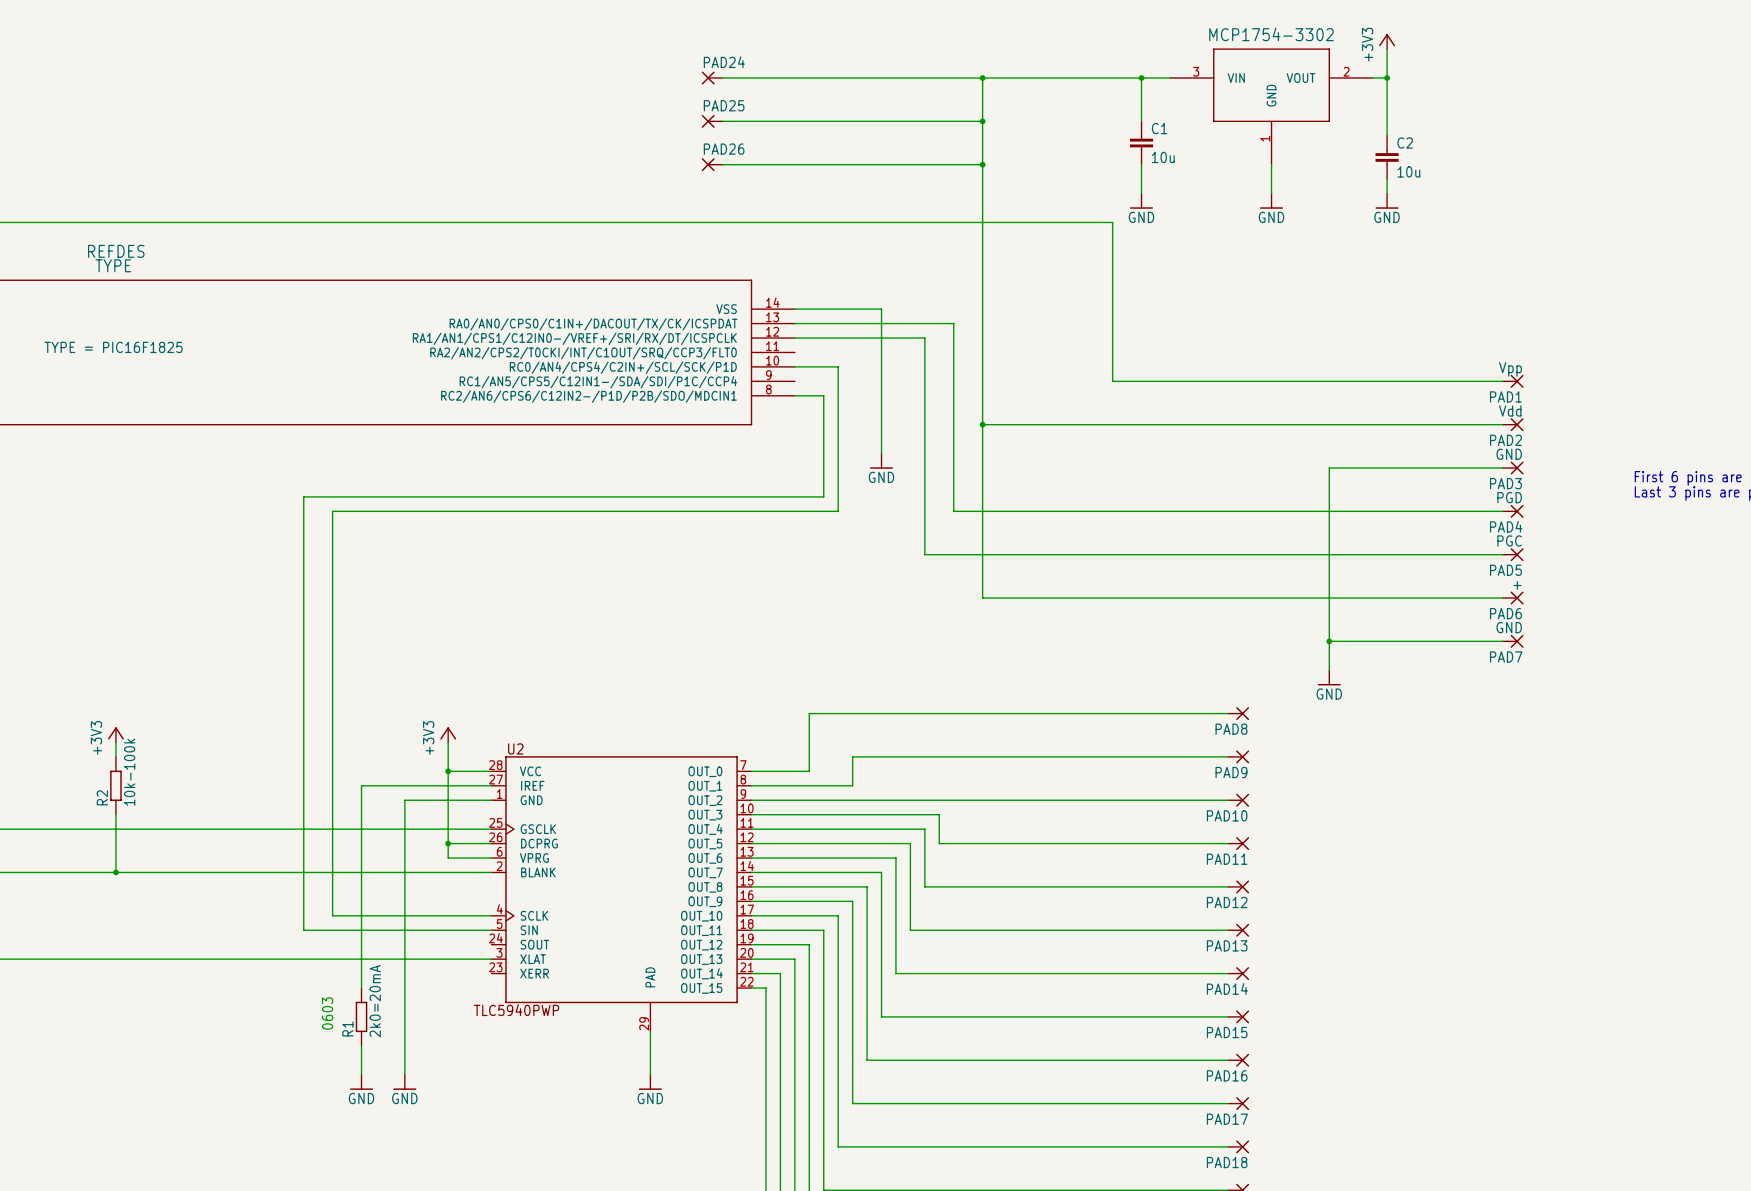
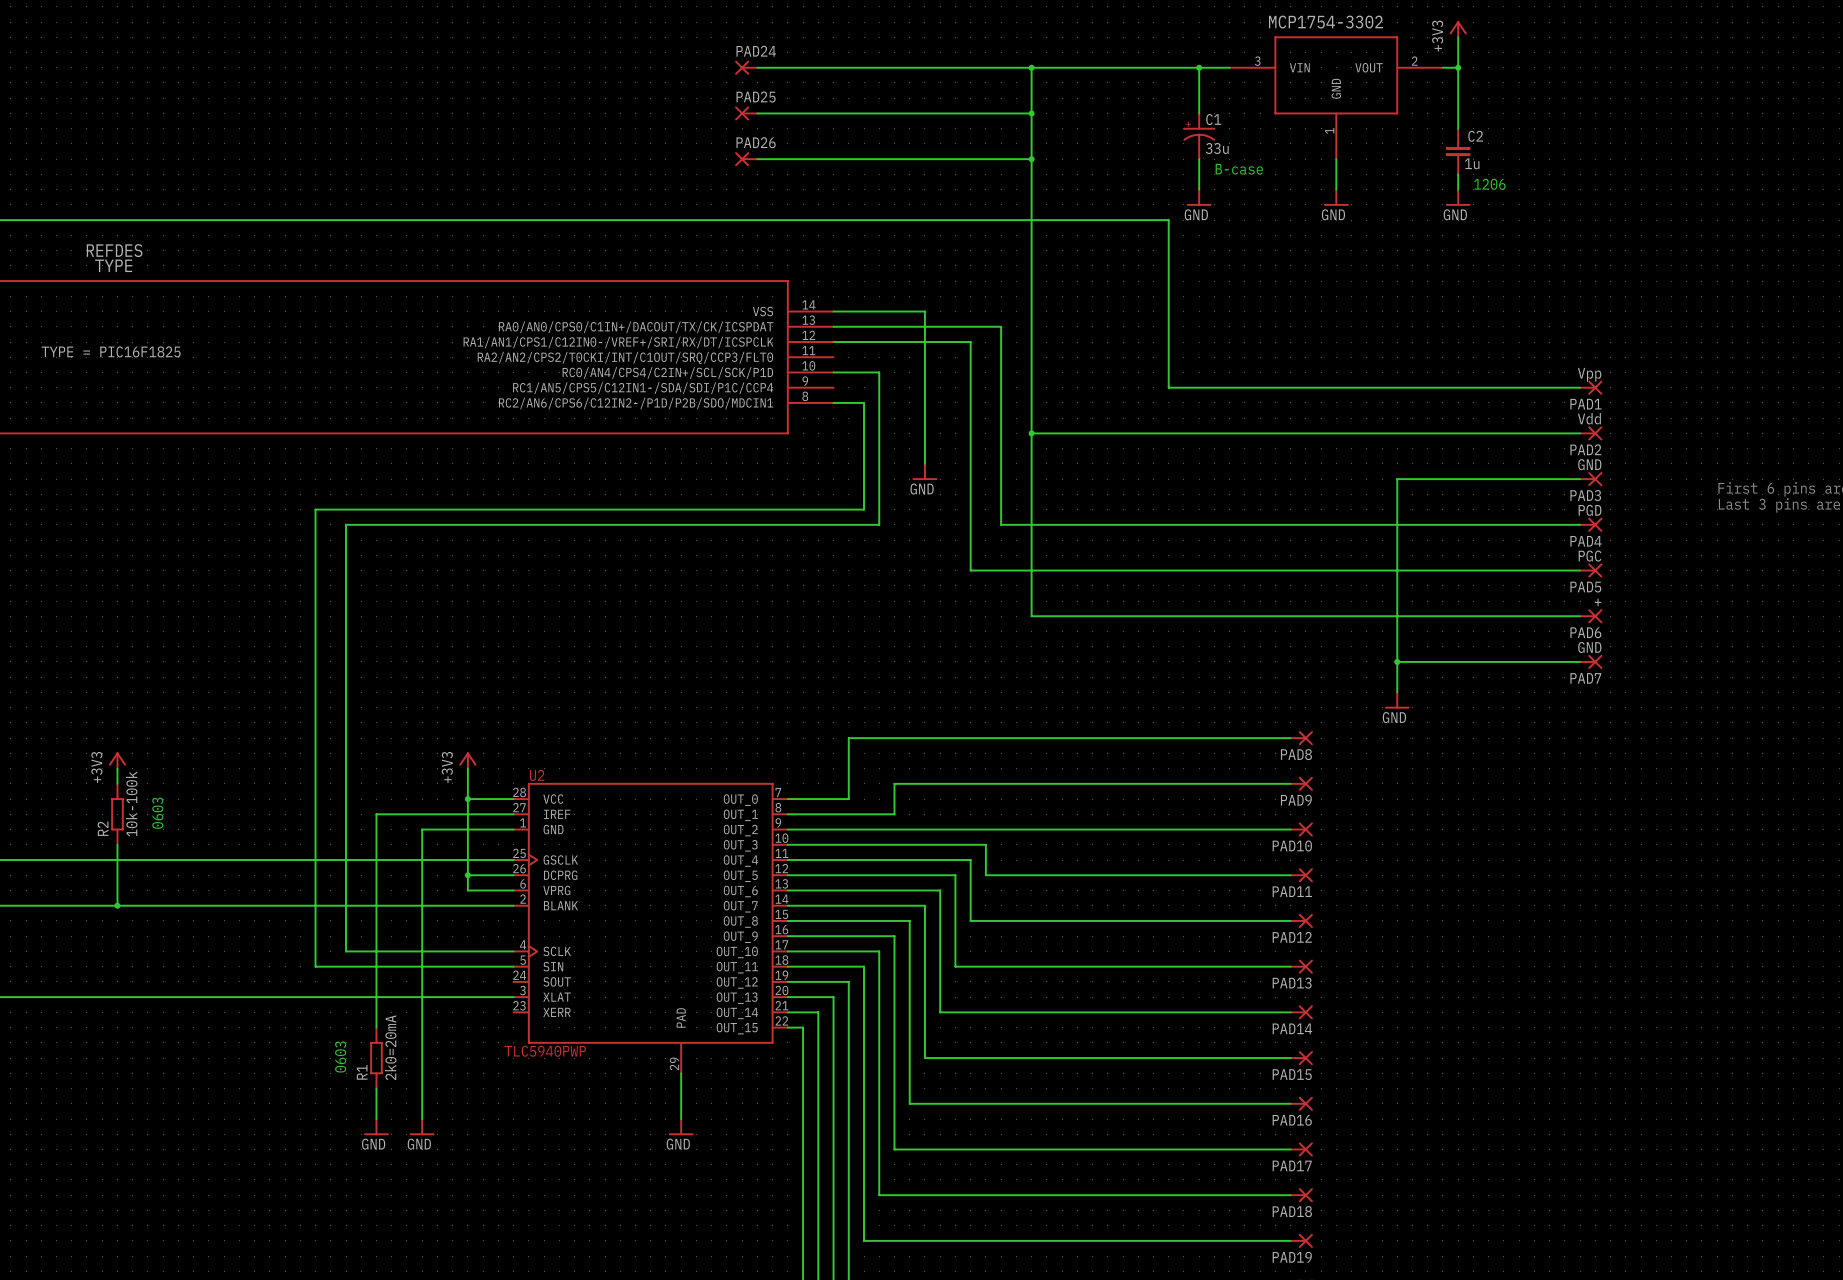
C1 symbol: [1129, 121, 1154, 165] -> [1183, 113, 1216, 160]
C1 value: 10u (1163, 157) -> 33u (1217, 148)
C2 value: 10u (1408, 171) -> 1u (1472, 163)
text: none -> B-case (1239, 169)
text: none -> 1206 (1489, 184)
text: none -> 0603 (157, 813)

